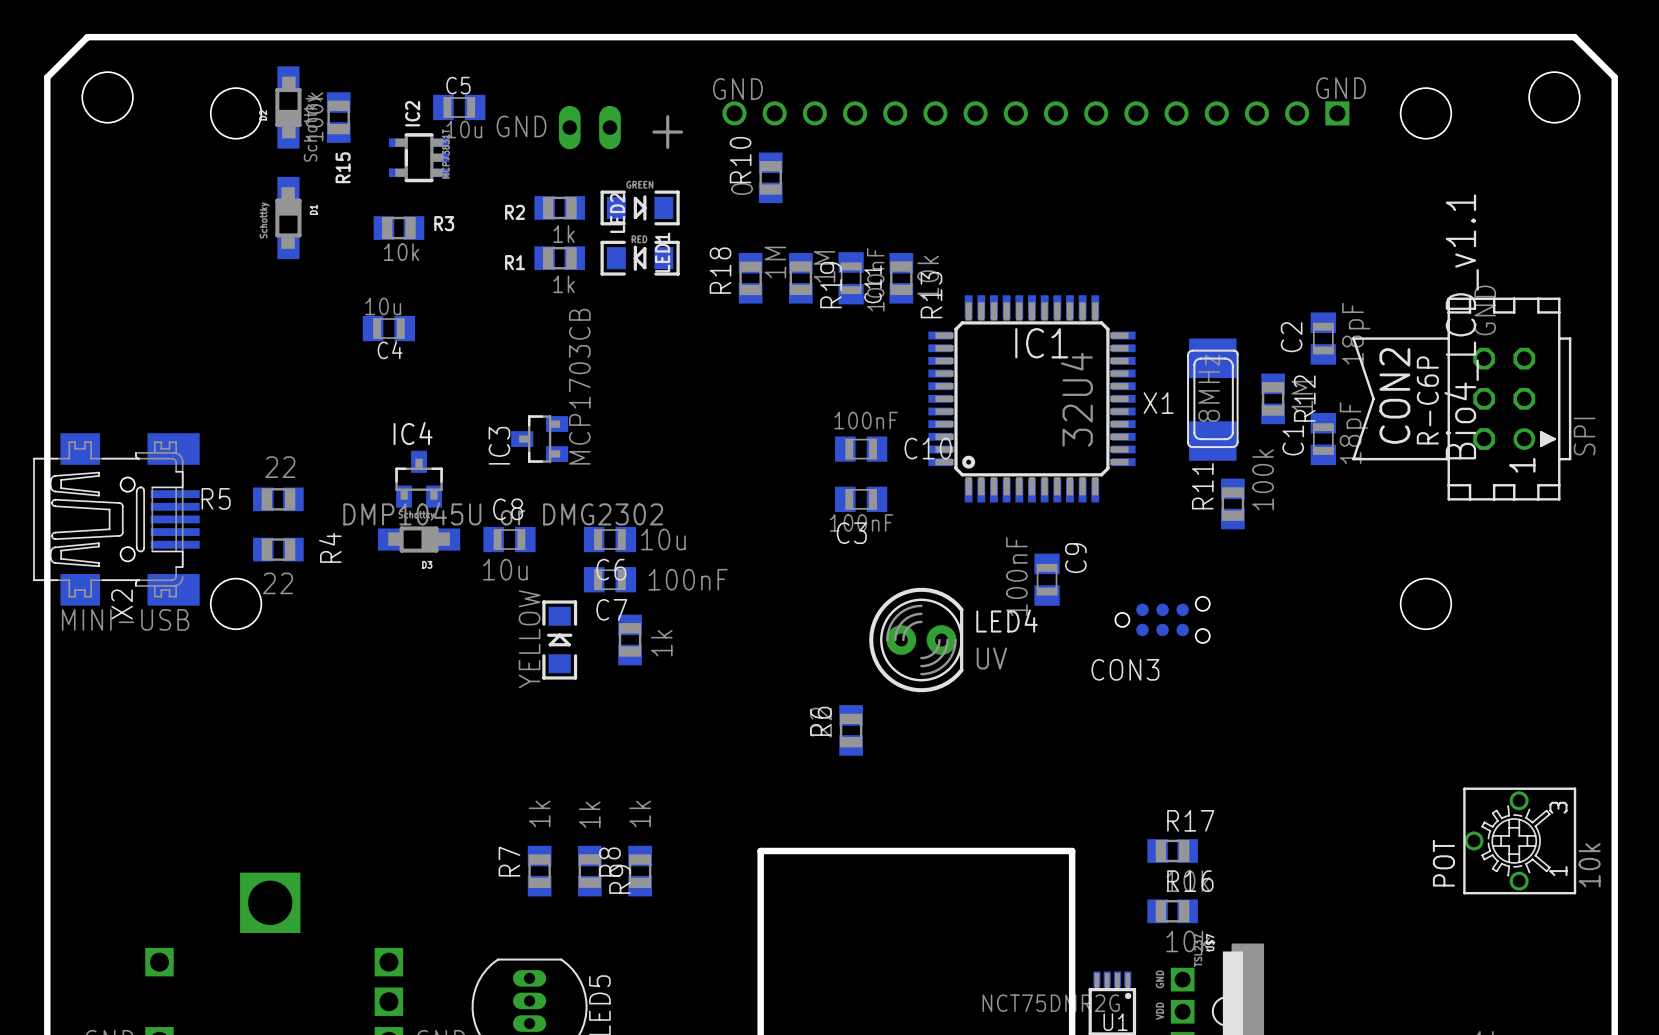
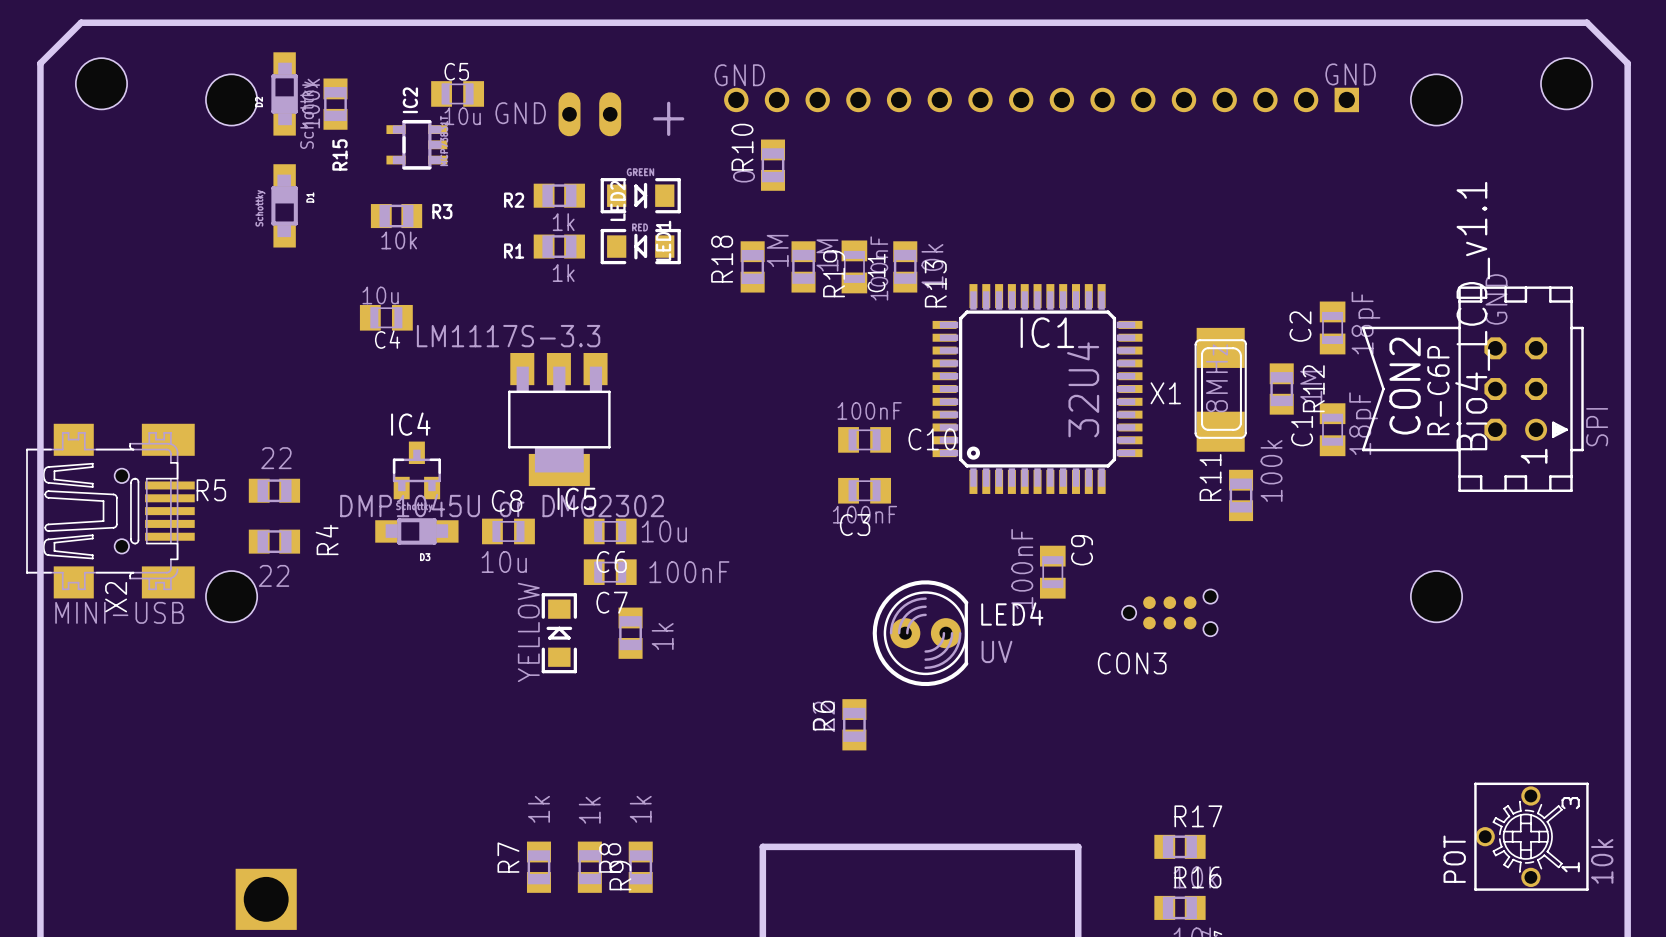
IC5: none -> LM1117S-3.3 (559, 419)
IC3: MCP1703CB (539, 439) -> none

